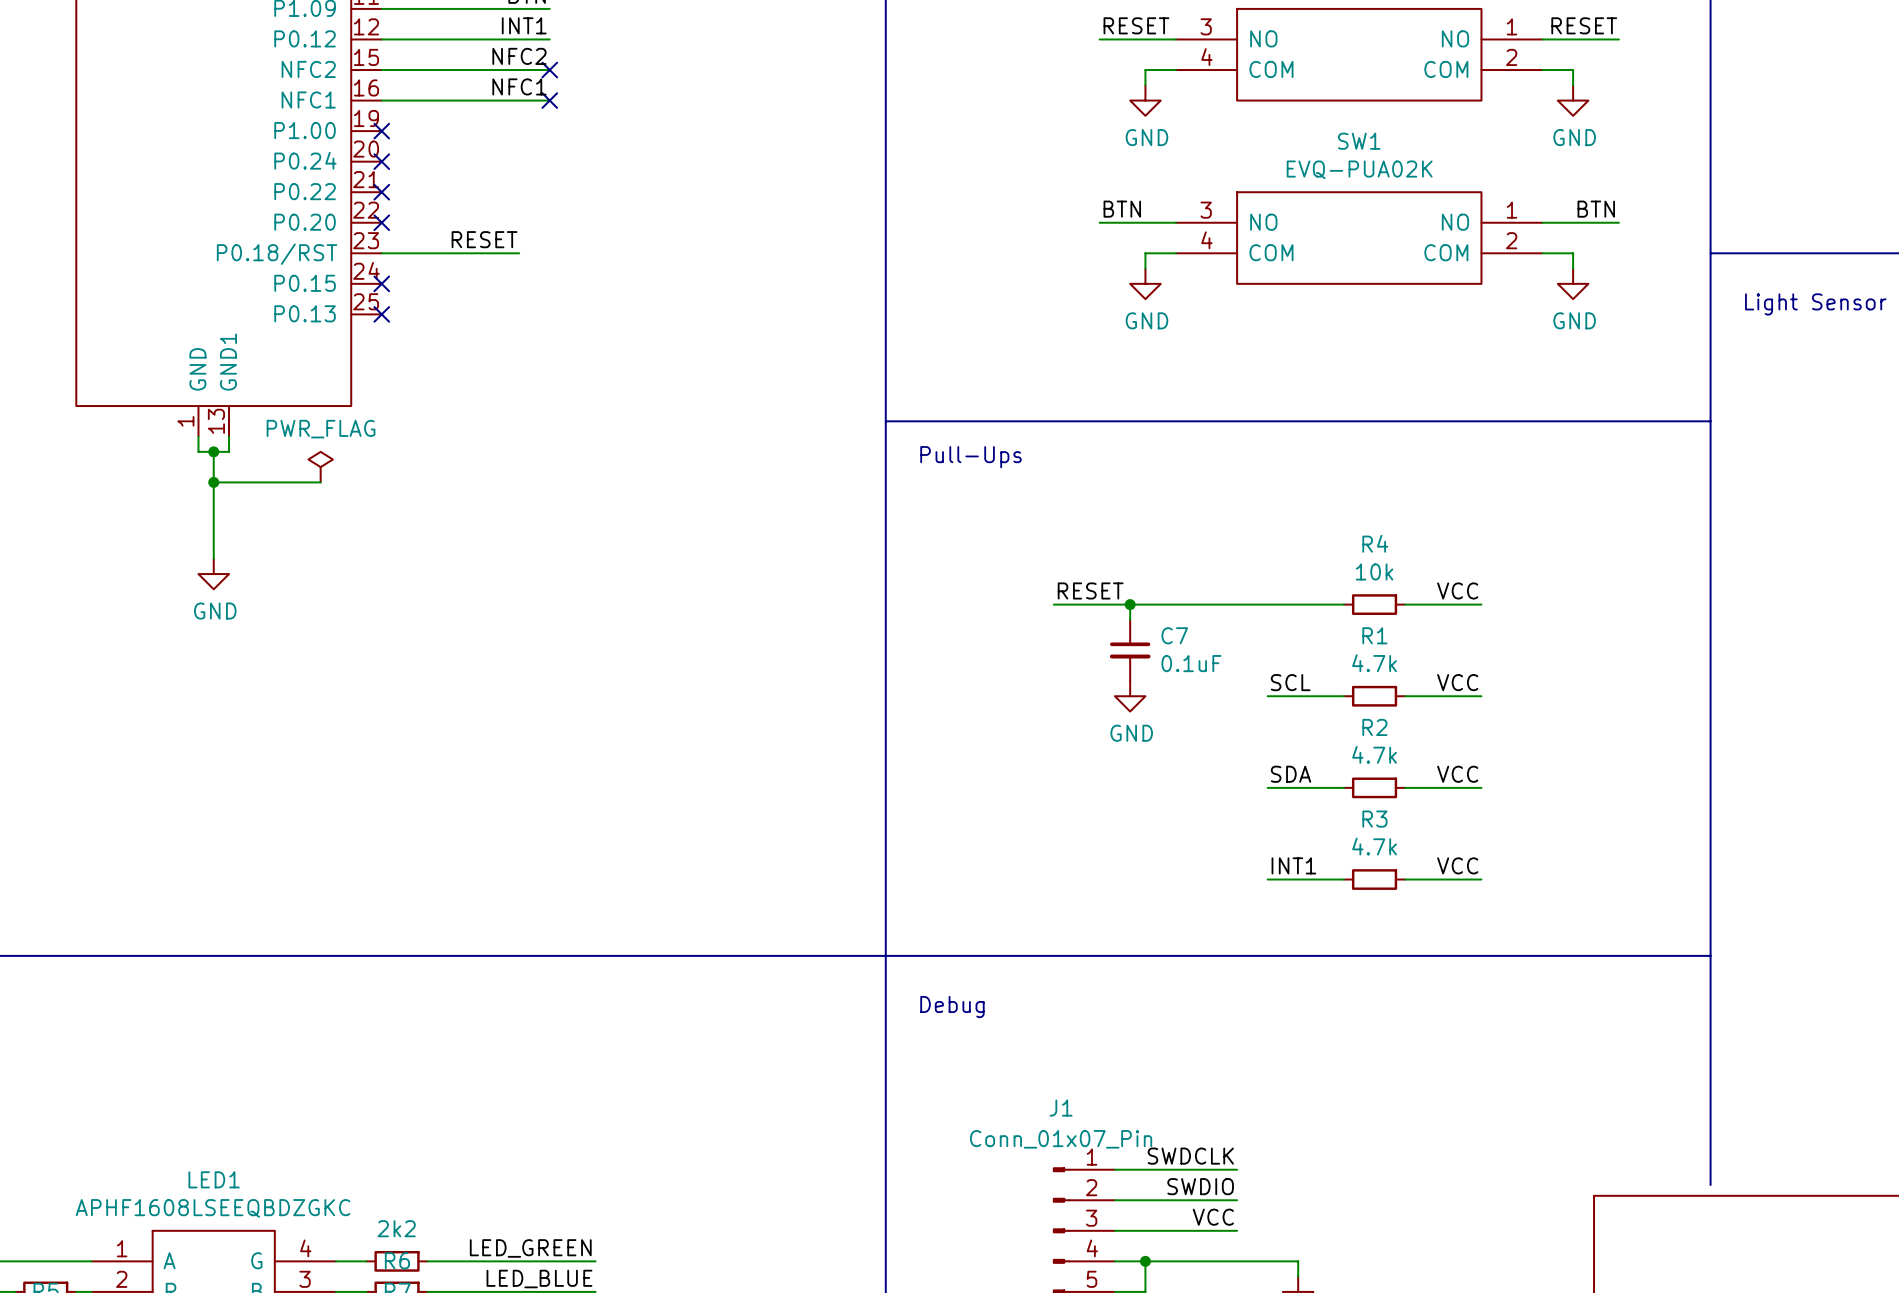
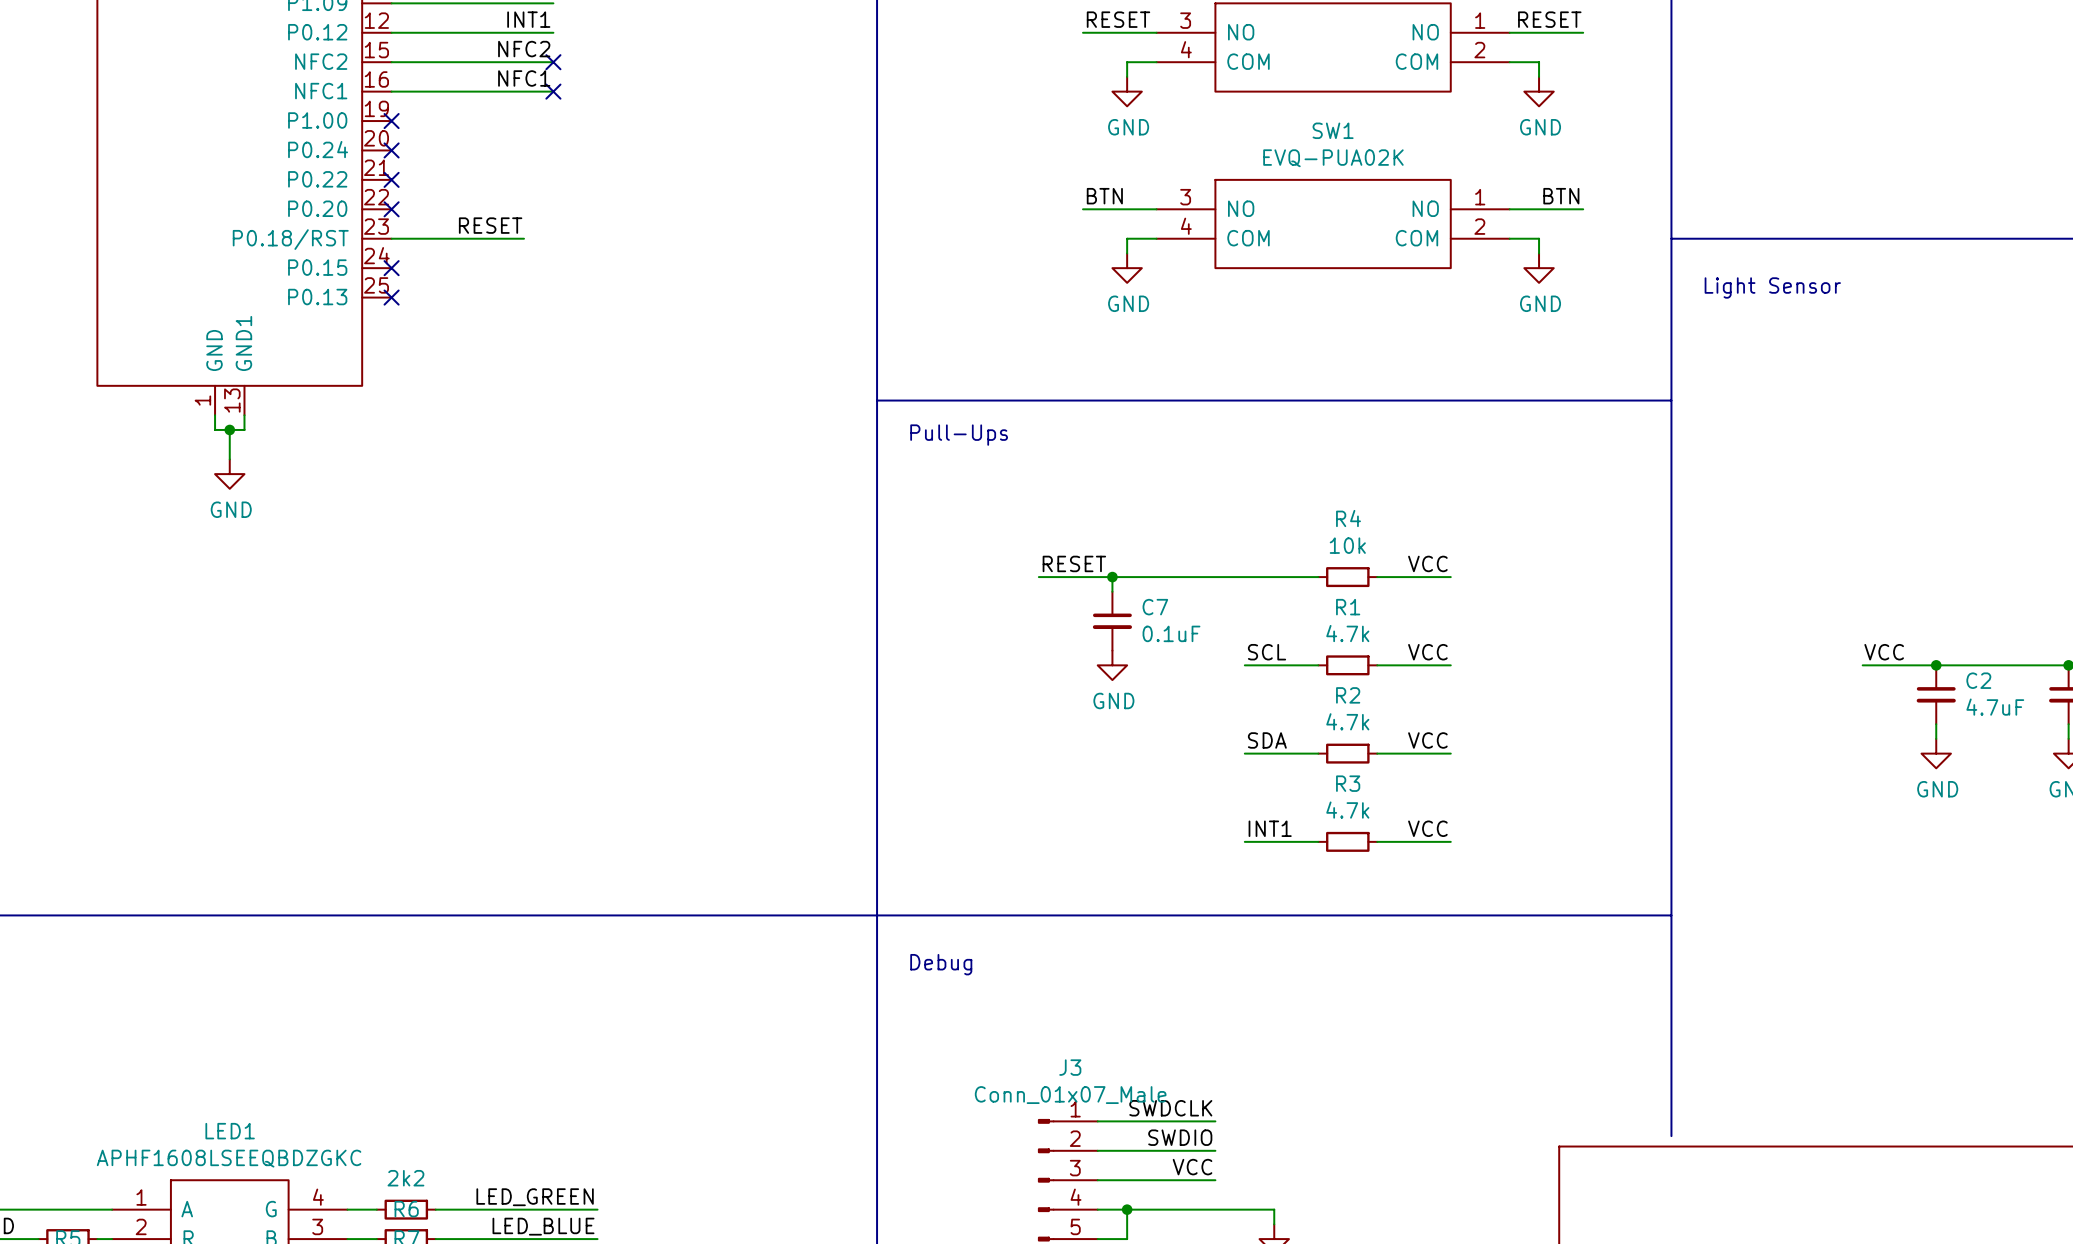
power symbol: PWR_FLAG (320, 467) -> none
junction: (213, 482) -> none
wire: (320, 482) (213, 482) (213, 558) -> none
power symbol position: GND (213, 574) -> GND (229, 474)
J1 name: J1 (1061, 1108) -> J3 (1070, 1067)
J1 value: Conn_01x07_Pin (1061, 1139) -> Conn_01x07_Male (1070, 1095)

